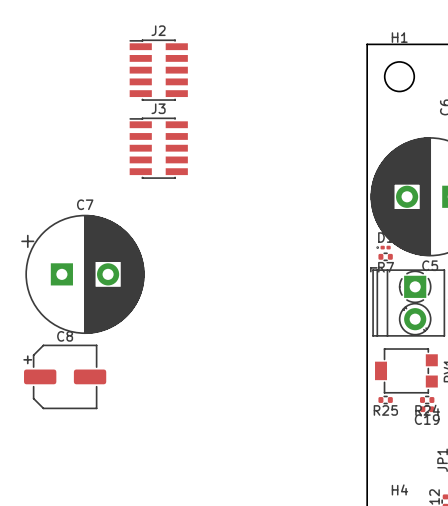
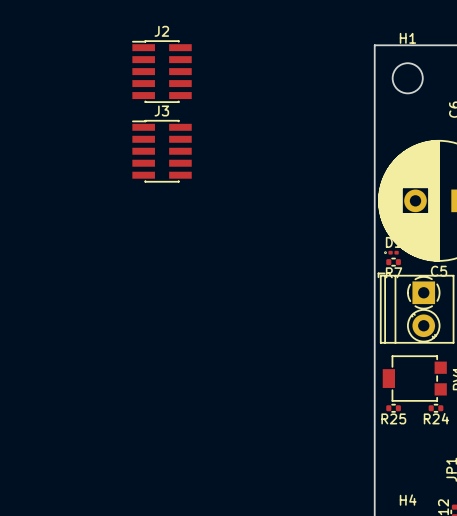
C7: (82, 274) -> none
C8: (64, 376) -> none
C19: (427, 409) -> none

